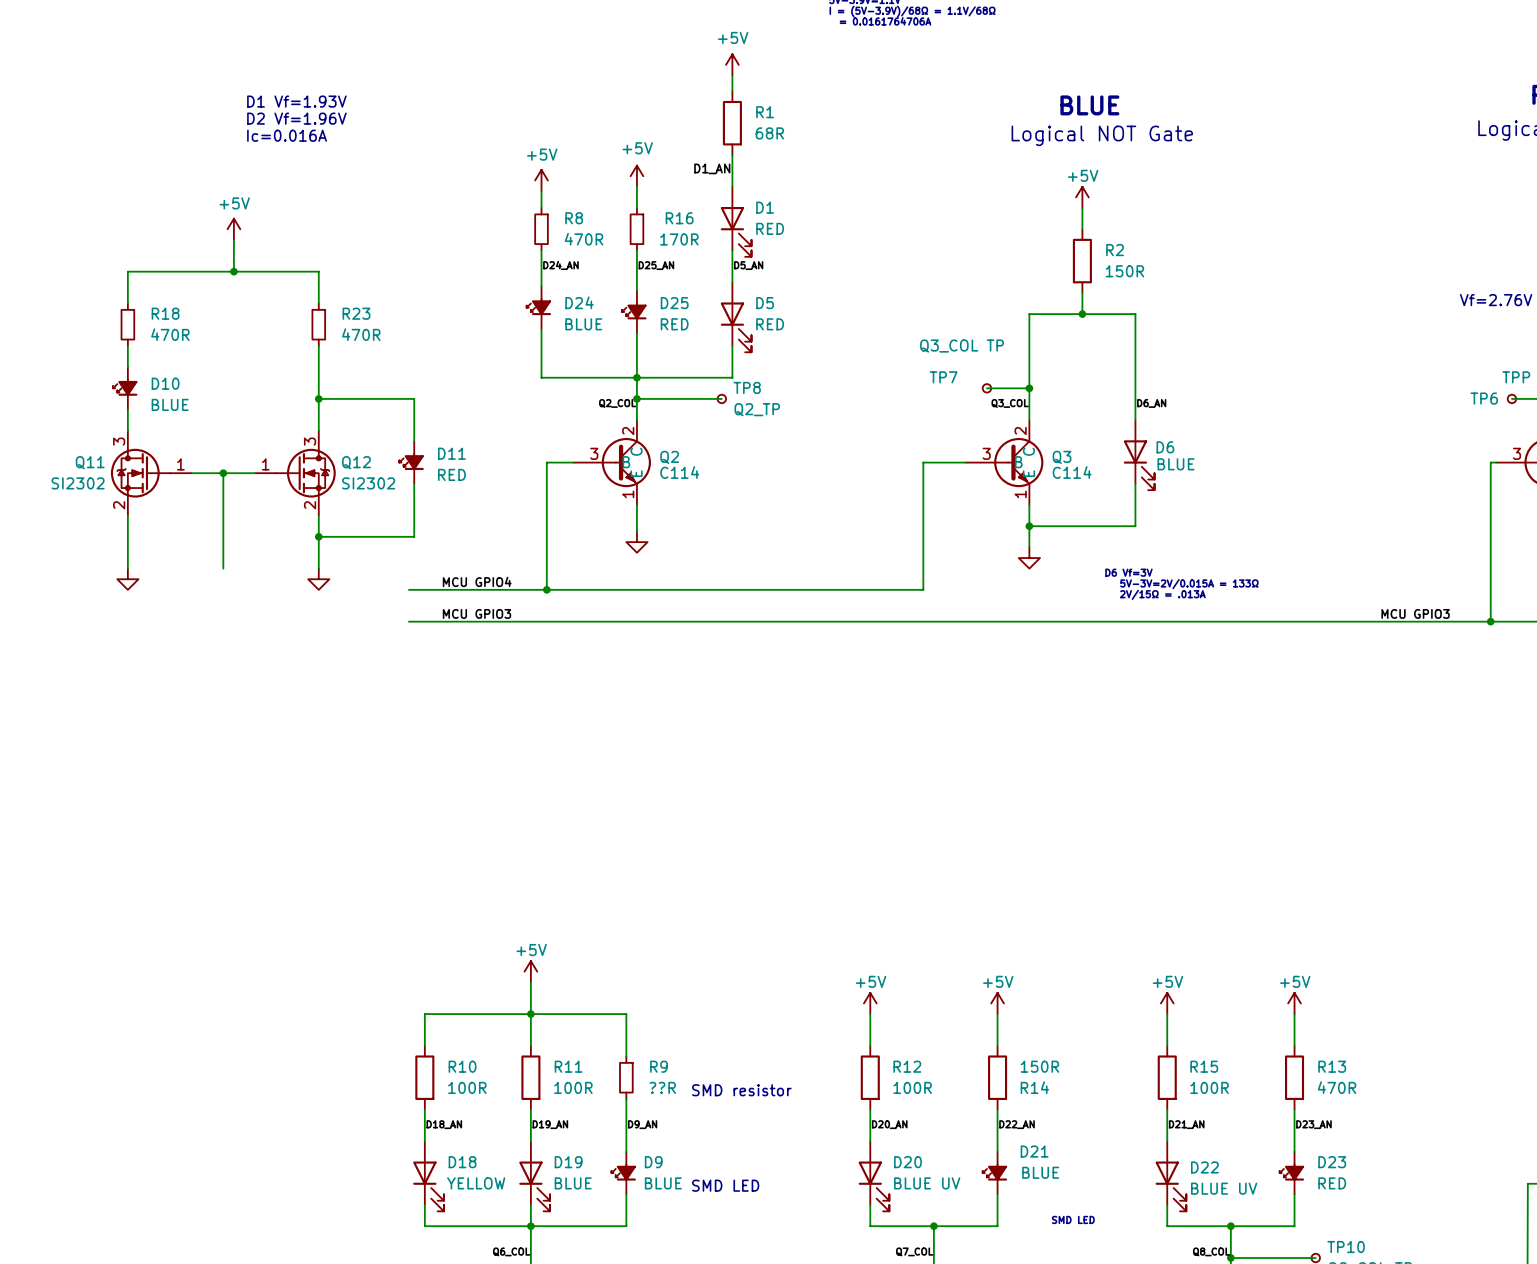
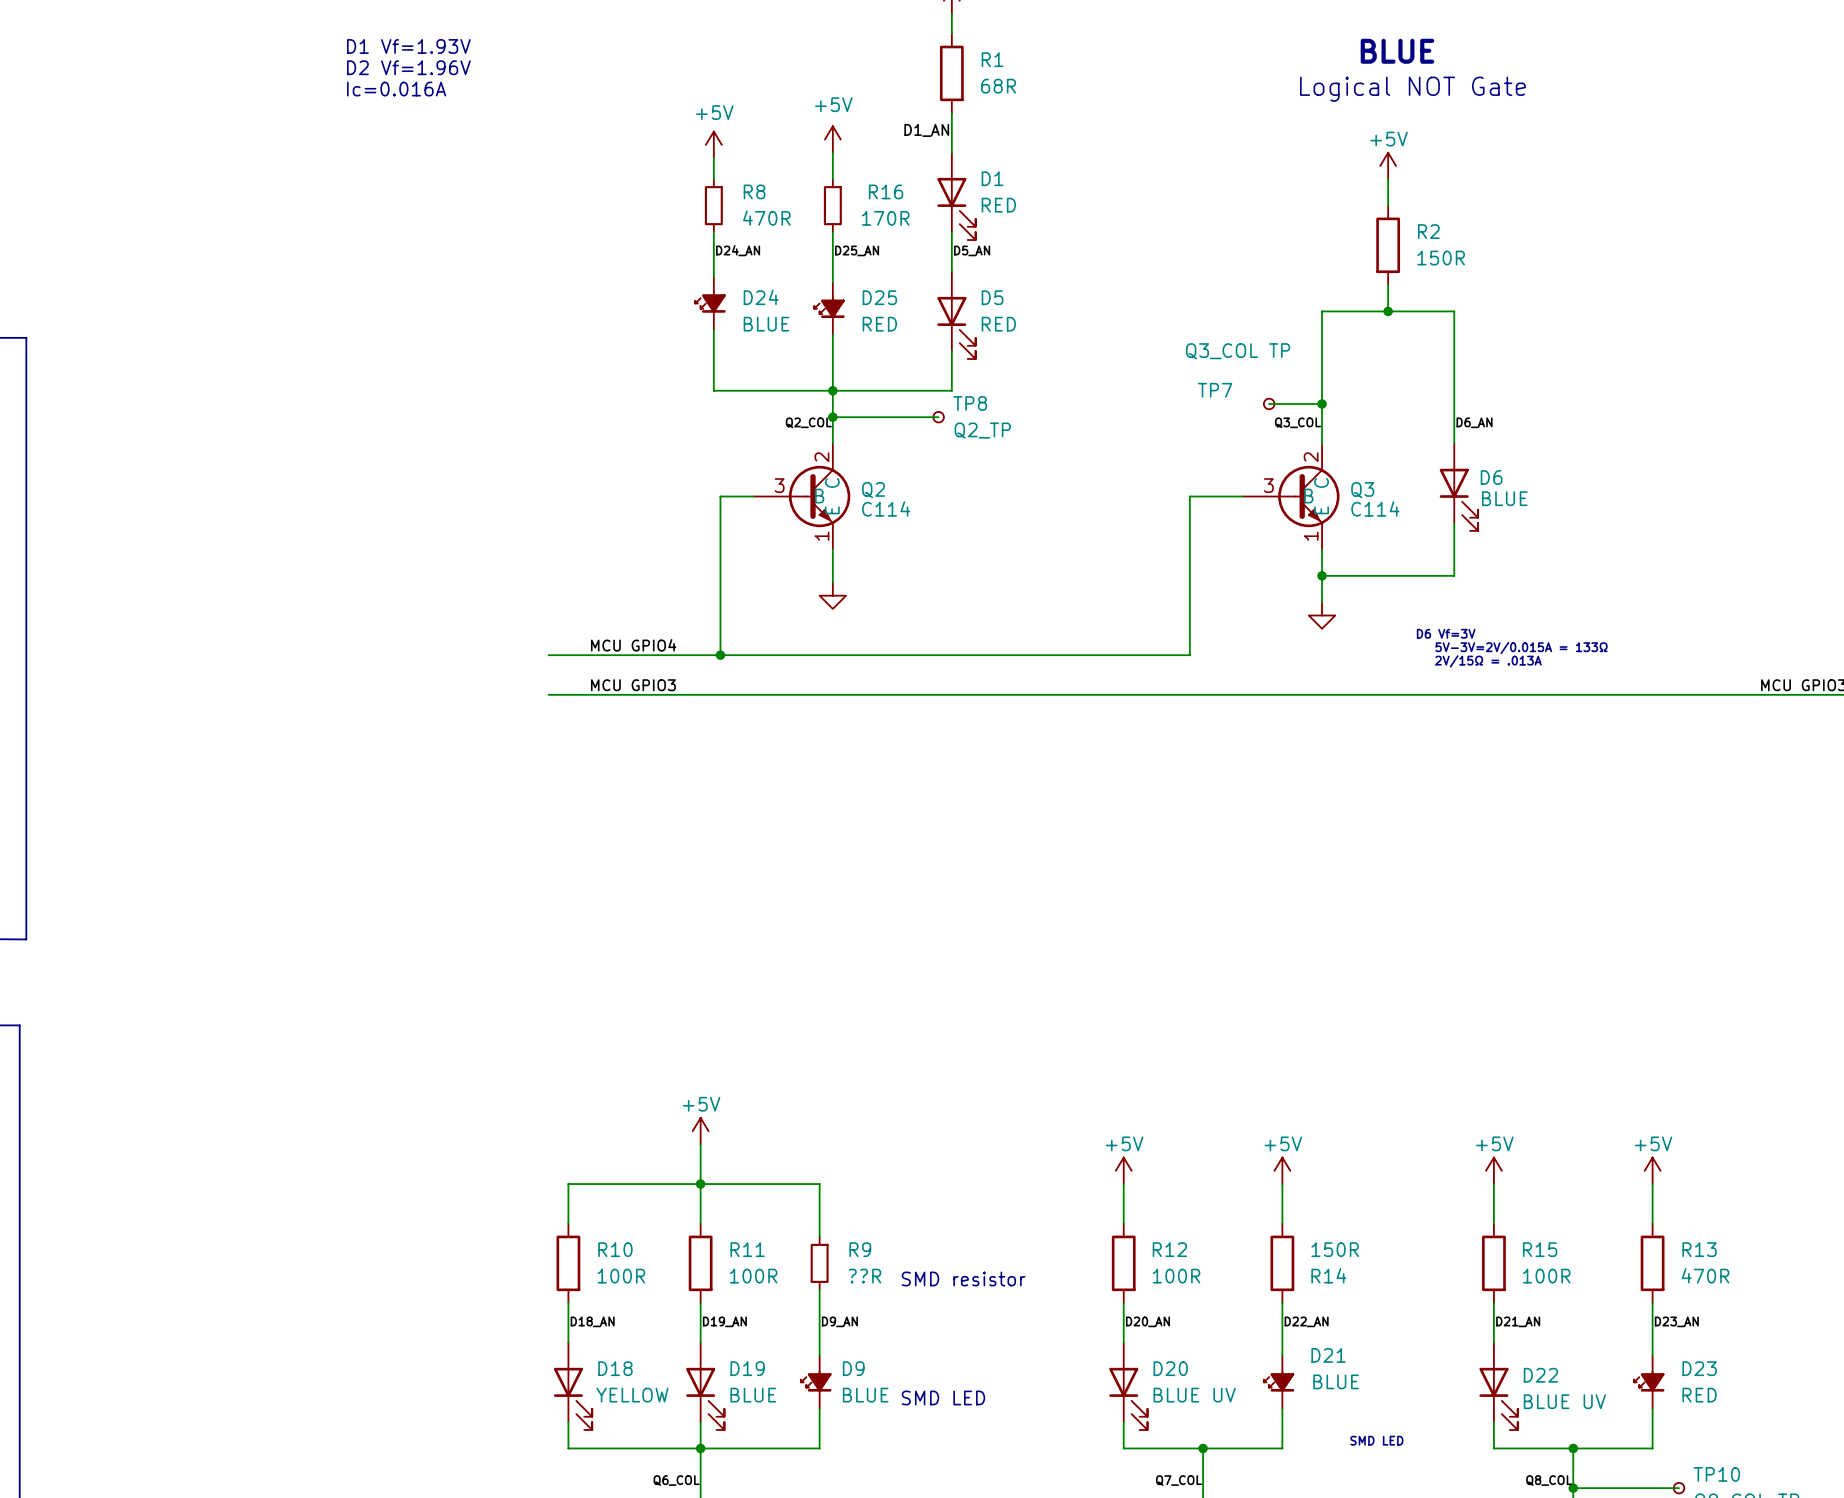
power symbol: +5V (233, 229) -> none
wire: (233, 239) (233, 271) -> none
junction: (233, 271) -> none
wire: (127, 303) (127, 271) (318, 271) (318, 303) -> none
R18: 470R (127, 324) -> none
R23: 470R (318, 324) -> none
wire: (127, 345) (127, 367) -> none
wire: (318, 345) (318, 430) -> none
D10: BLUE (125, 388) -> none
wire: (318, 398) (414, 398) (414, 441) -> none
junction: (318, 398) -> none
wire: (127, 409) (127, 430) -> none
D11: RED (411, 462) -> none
Q11: SI2302 (151, 473) -> none
wire: (191, 473) (255, 473) -> none
wire: (223, 473) (223, 568) -> none
junction: (223, 473) -> none
Q12: SI2302 (295, 473) -> none
wire: (414, 483) (414, 536) (318, 536) -> none
wire: (127, 515) (127, 568) -> none
wire: (318, 515) (318, 568) -> none
junction: (318, 536) -> none
power symbol: (127, 579) -> none
power symbol: (318, 579) -> none

